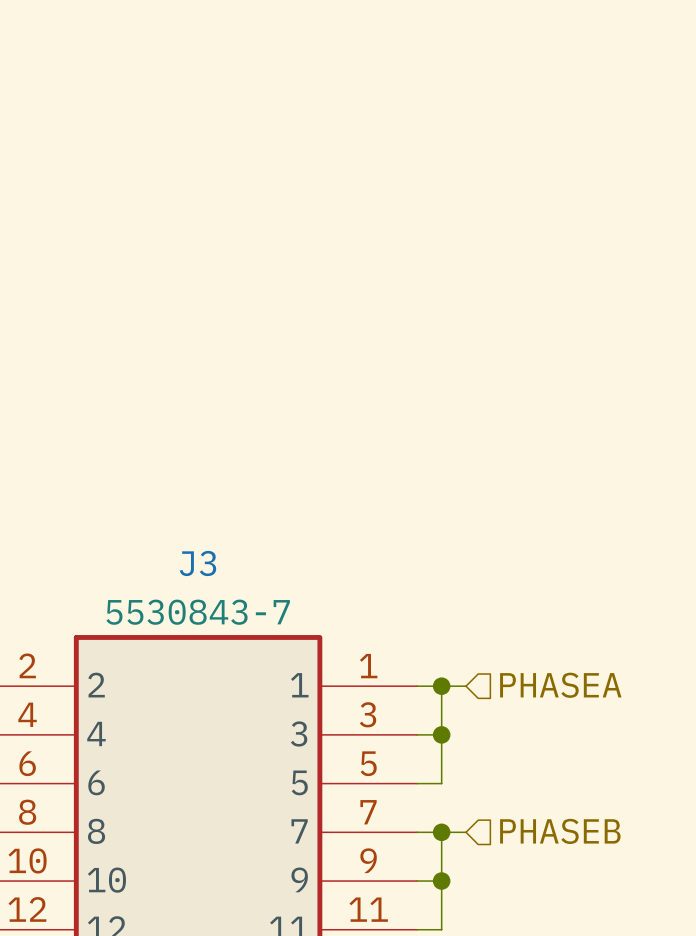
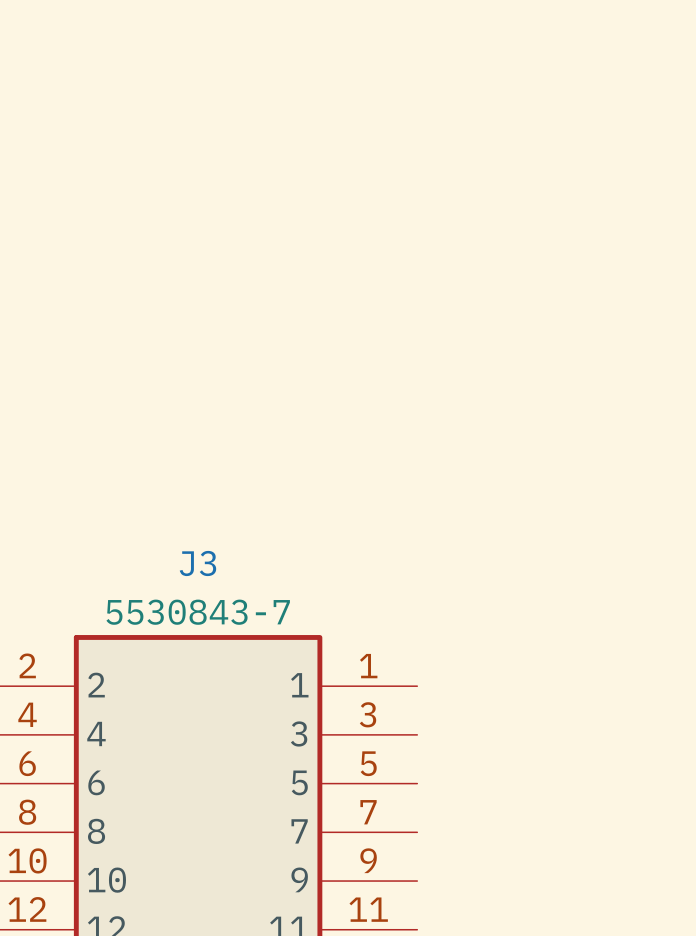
hierarchical label: PHASEA (560, 685) -> none
wire: (417, 686) (466, 686) -> none
wire: (441, 686) (441, 783) (417, 783) -> none
junction: (441, 686) -> none
wire: (417, 734) (441, 734) -> none
junction: (441, 734) -> none
hierarchical label: PHASEB (560, 831) -> none
wire: (417, 832) (466, 832) -> none
wire: (441, 832) (441, 929) (417, 929) -> none
junction: (441, 832) -> none
wire: (417, 881) (441, 881) -> none
junction: (441, 881) -> none

